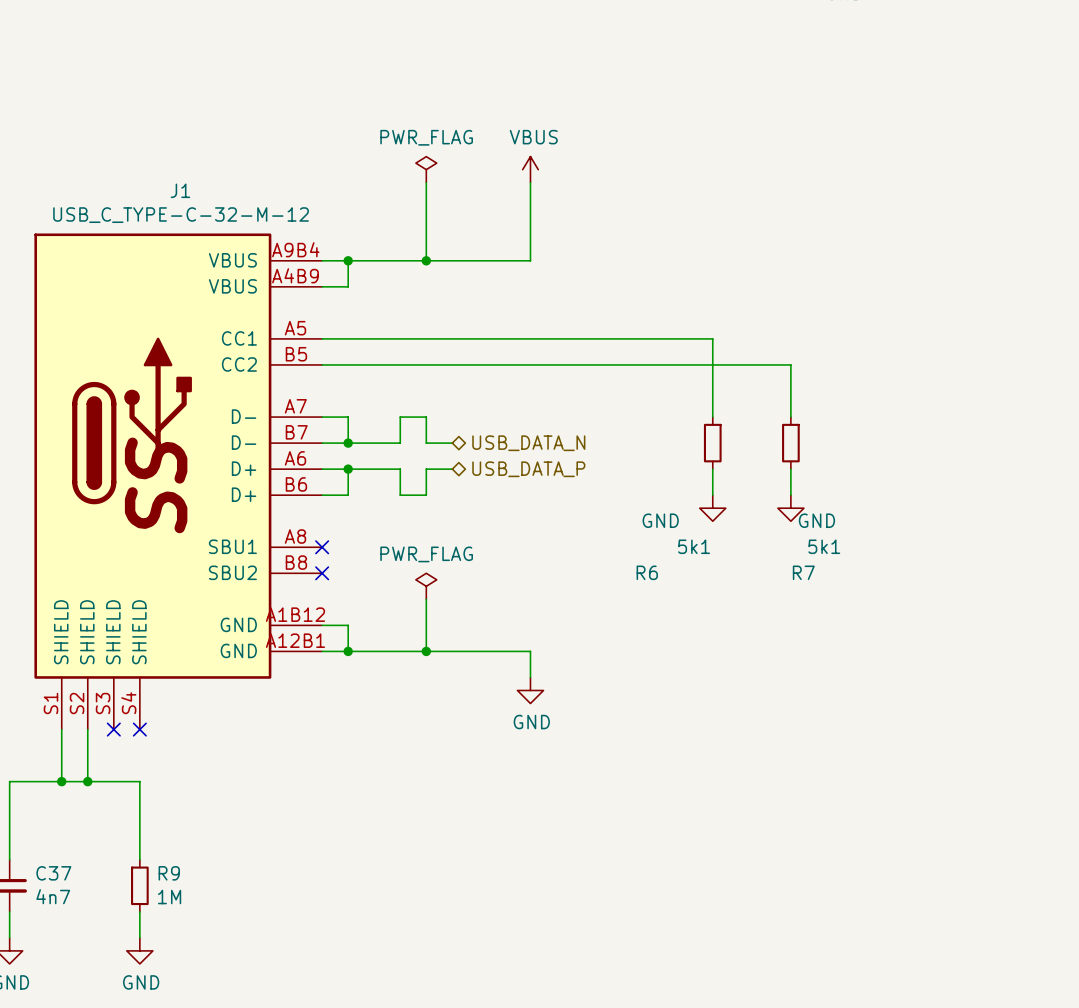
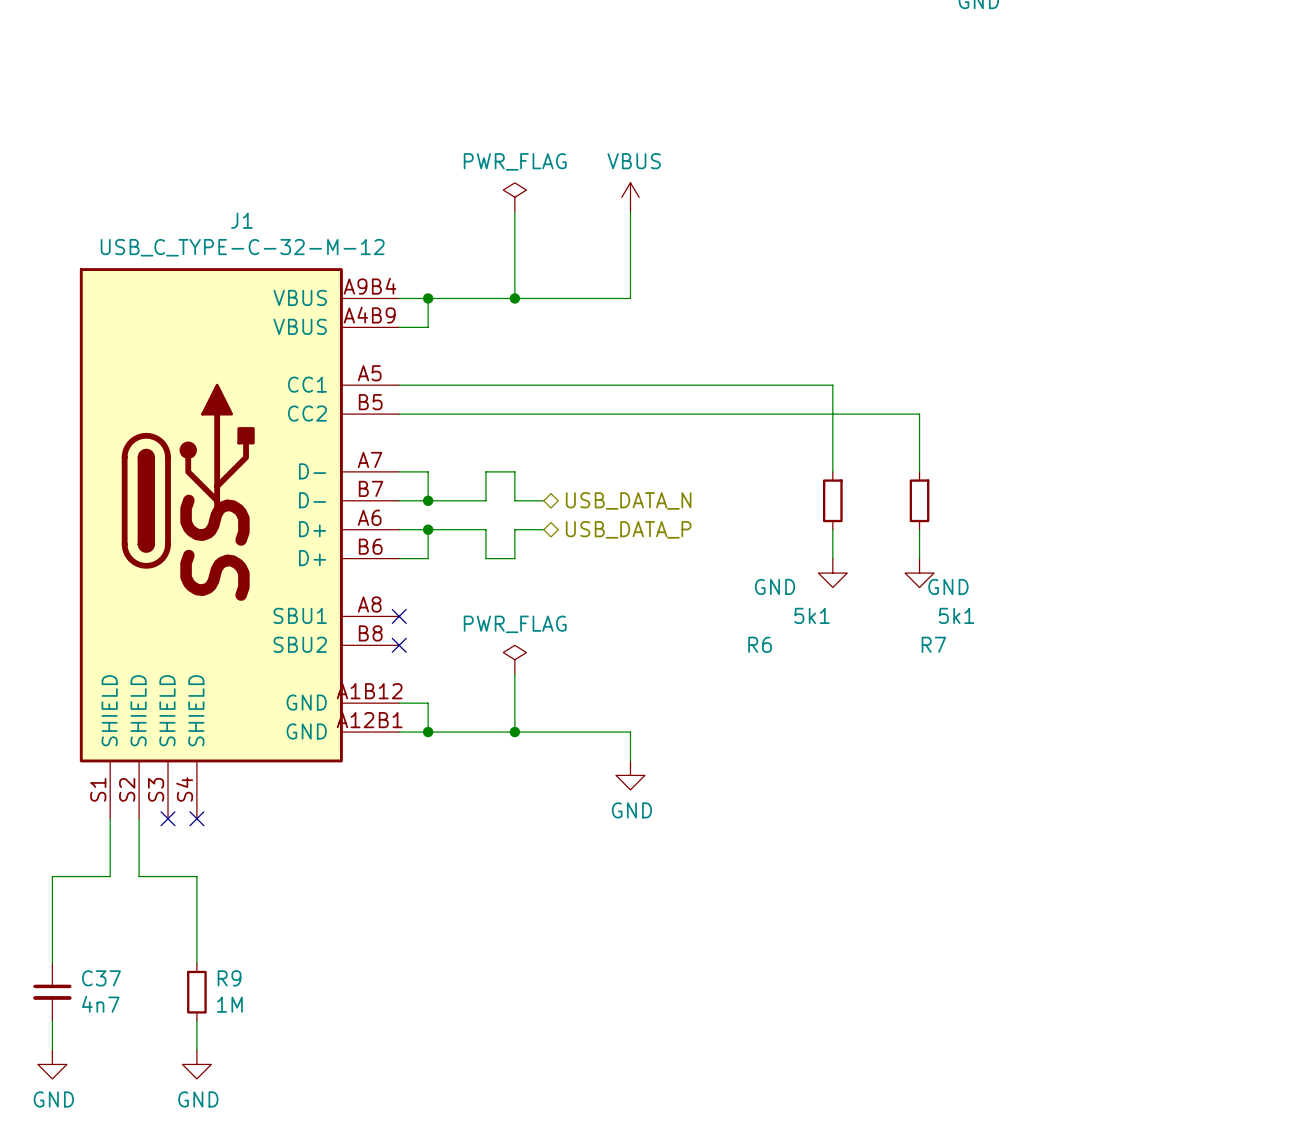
wire: (61, 781) (87, 781) -> none
junction: (61, 781) -> none
junction: (87, 781) -> none

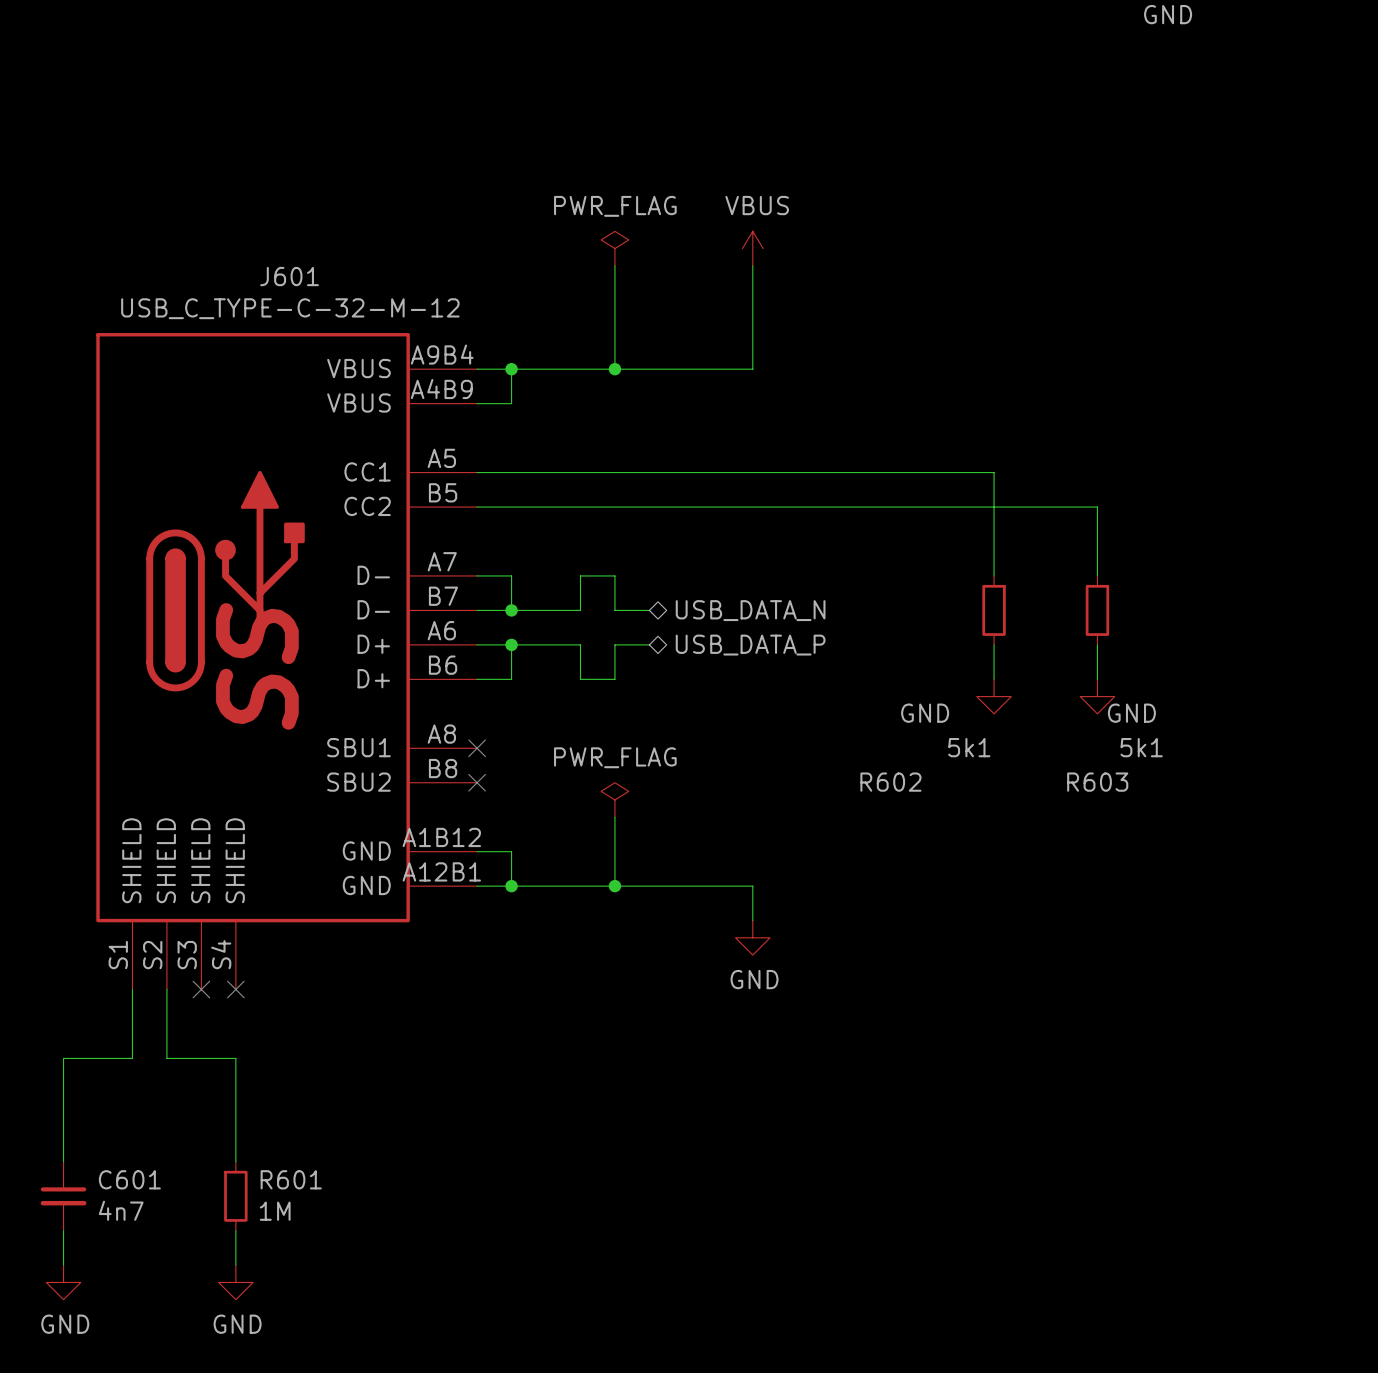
J1 name: J1 (241, 220) -> J601 (289, 276)
R6 name: R6 (760, 644) -> R602 (890, 782)
R7 name: R7 (933, 644) -> R603 (1097, 782)
C37 name: C37 (101, 978) -> C601 (129, 1179)
R9 name: R9 (229, 978) -> R601 (291, 1179)

